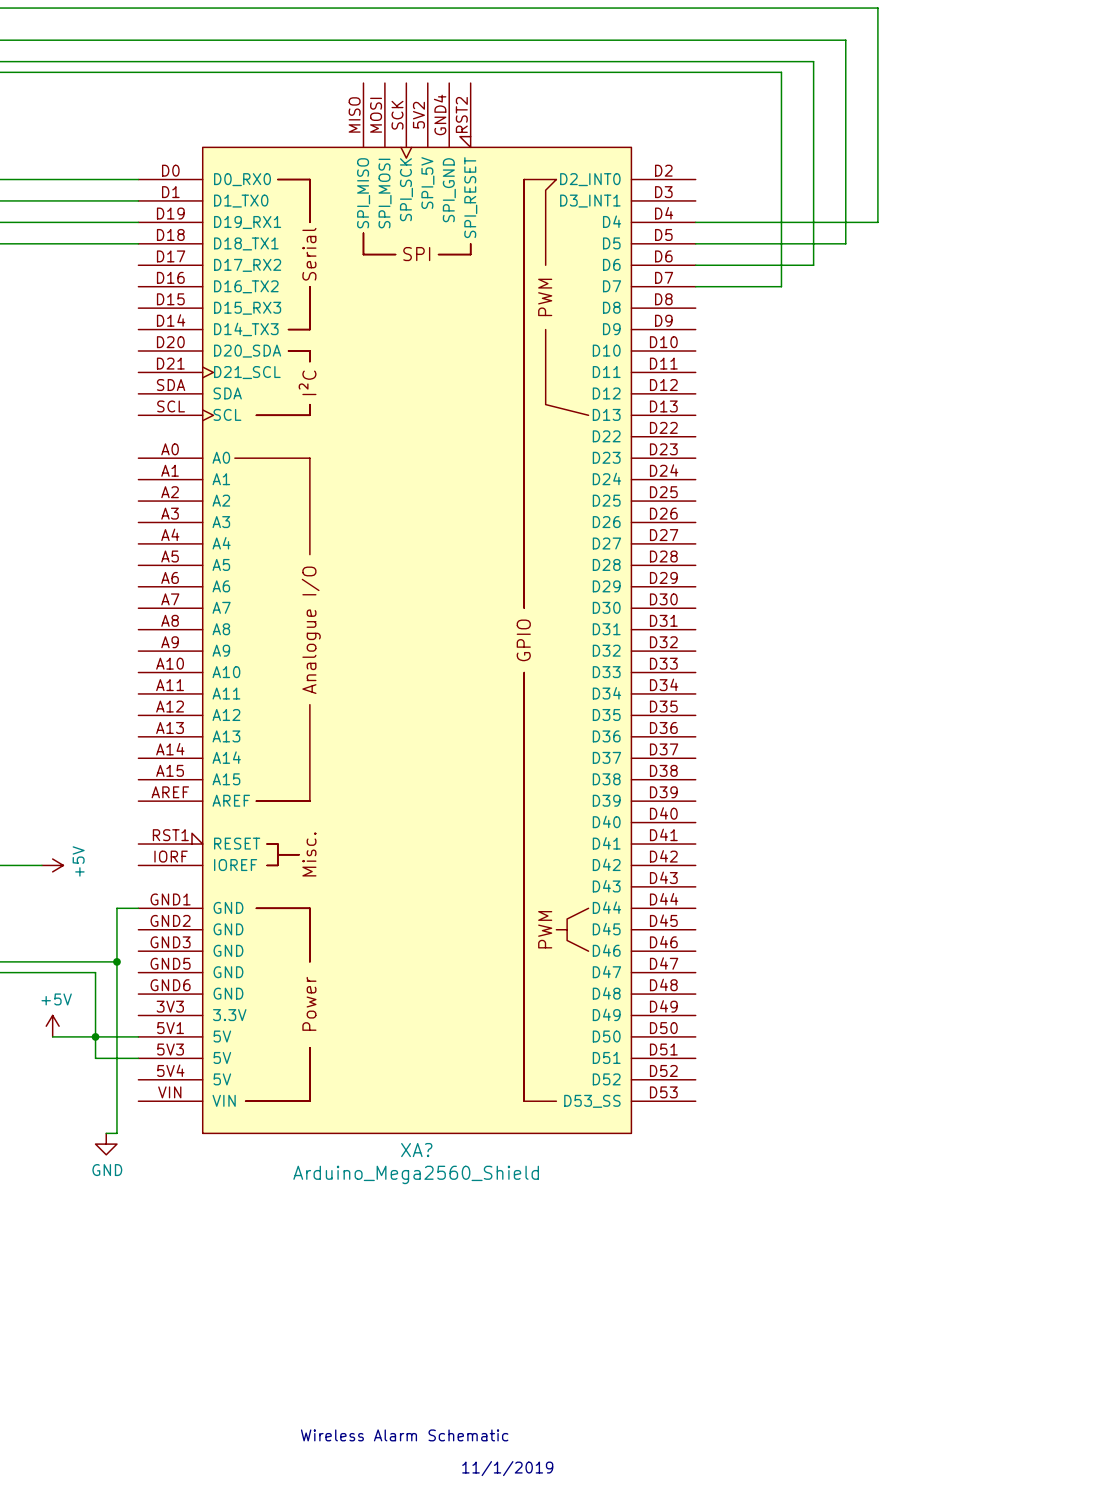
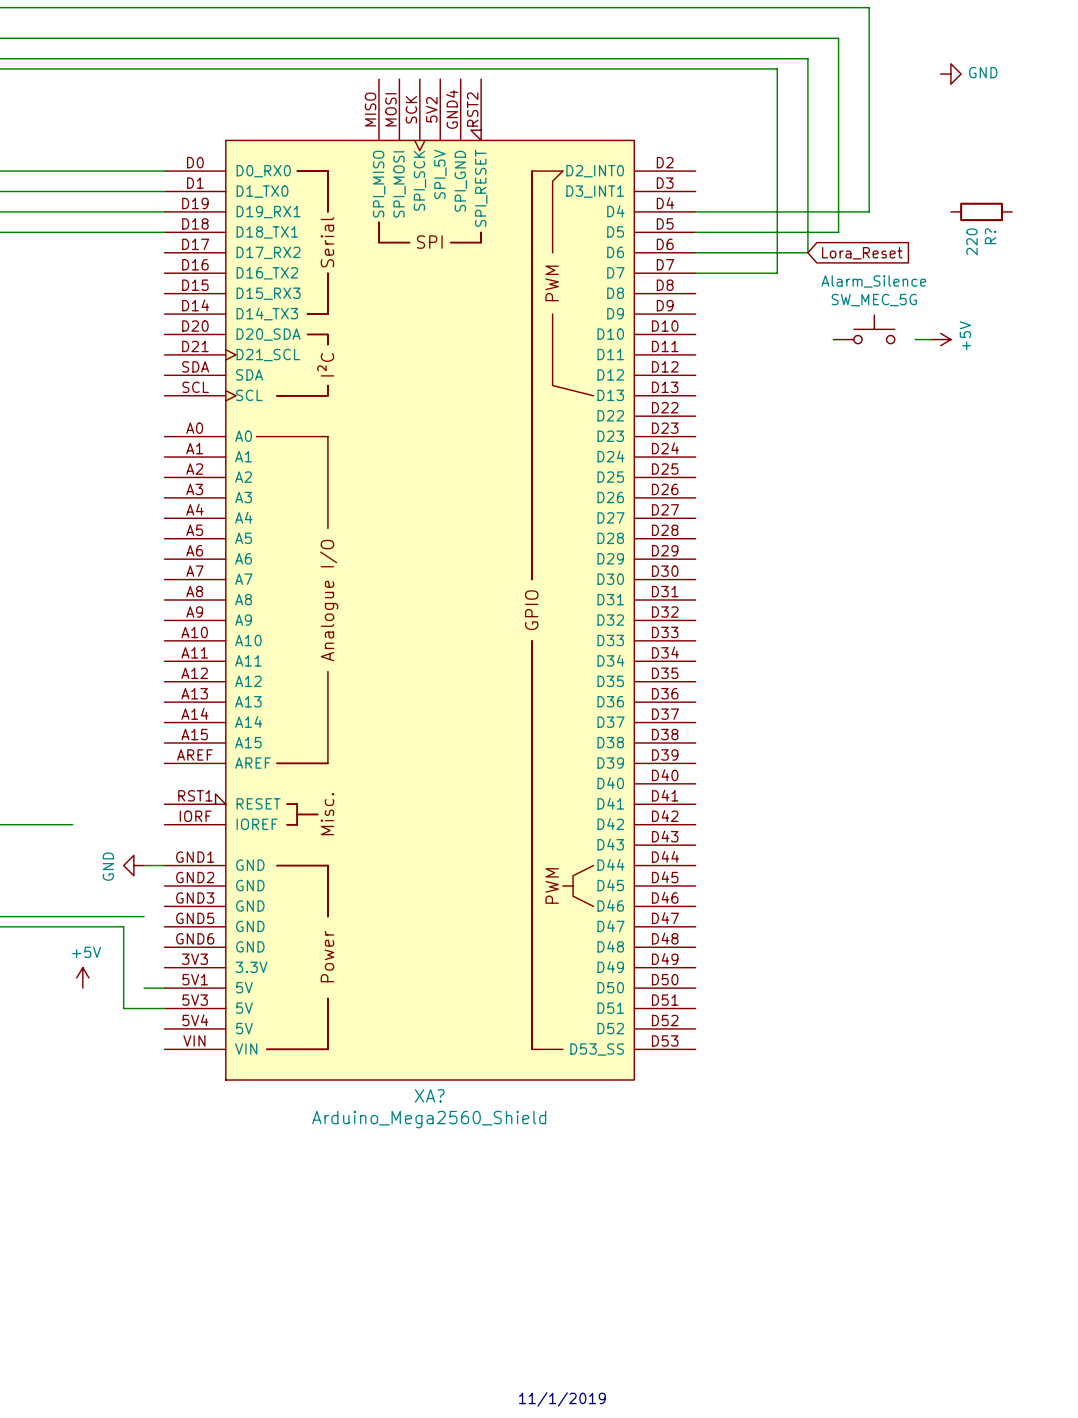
power symbol: none -> GND (950, 74)
R?: none -> 220 (981, 211)
global label: none -> Lora_Reset (862, 253)
Alarm_Silence: none -> SW_MEC_5G (864, 329)
wire: none -> (915, 339) (930, 339)
power symbol: none -> +5V (940, 339)
power symbol: +5V (52, 865) -> none
power symbol: none -> GND (133, 865)
wire: (116, 908) (116, 1133) (106, 1133) -> none
junction: (116, 961) -> none
wire: (52, 1036) (116, 1036) -> none
junction: (95, 1036) -> none
power symbol: GND (106, 1144) -> none
text: Wireless Alarm Schematic (404, 1435) -> none
text position: 11/1/2019 (507, 1468) -> 11/1/2019 (562, 1399)

